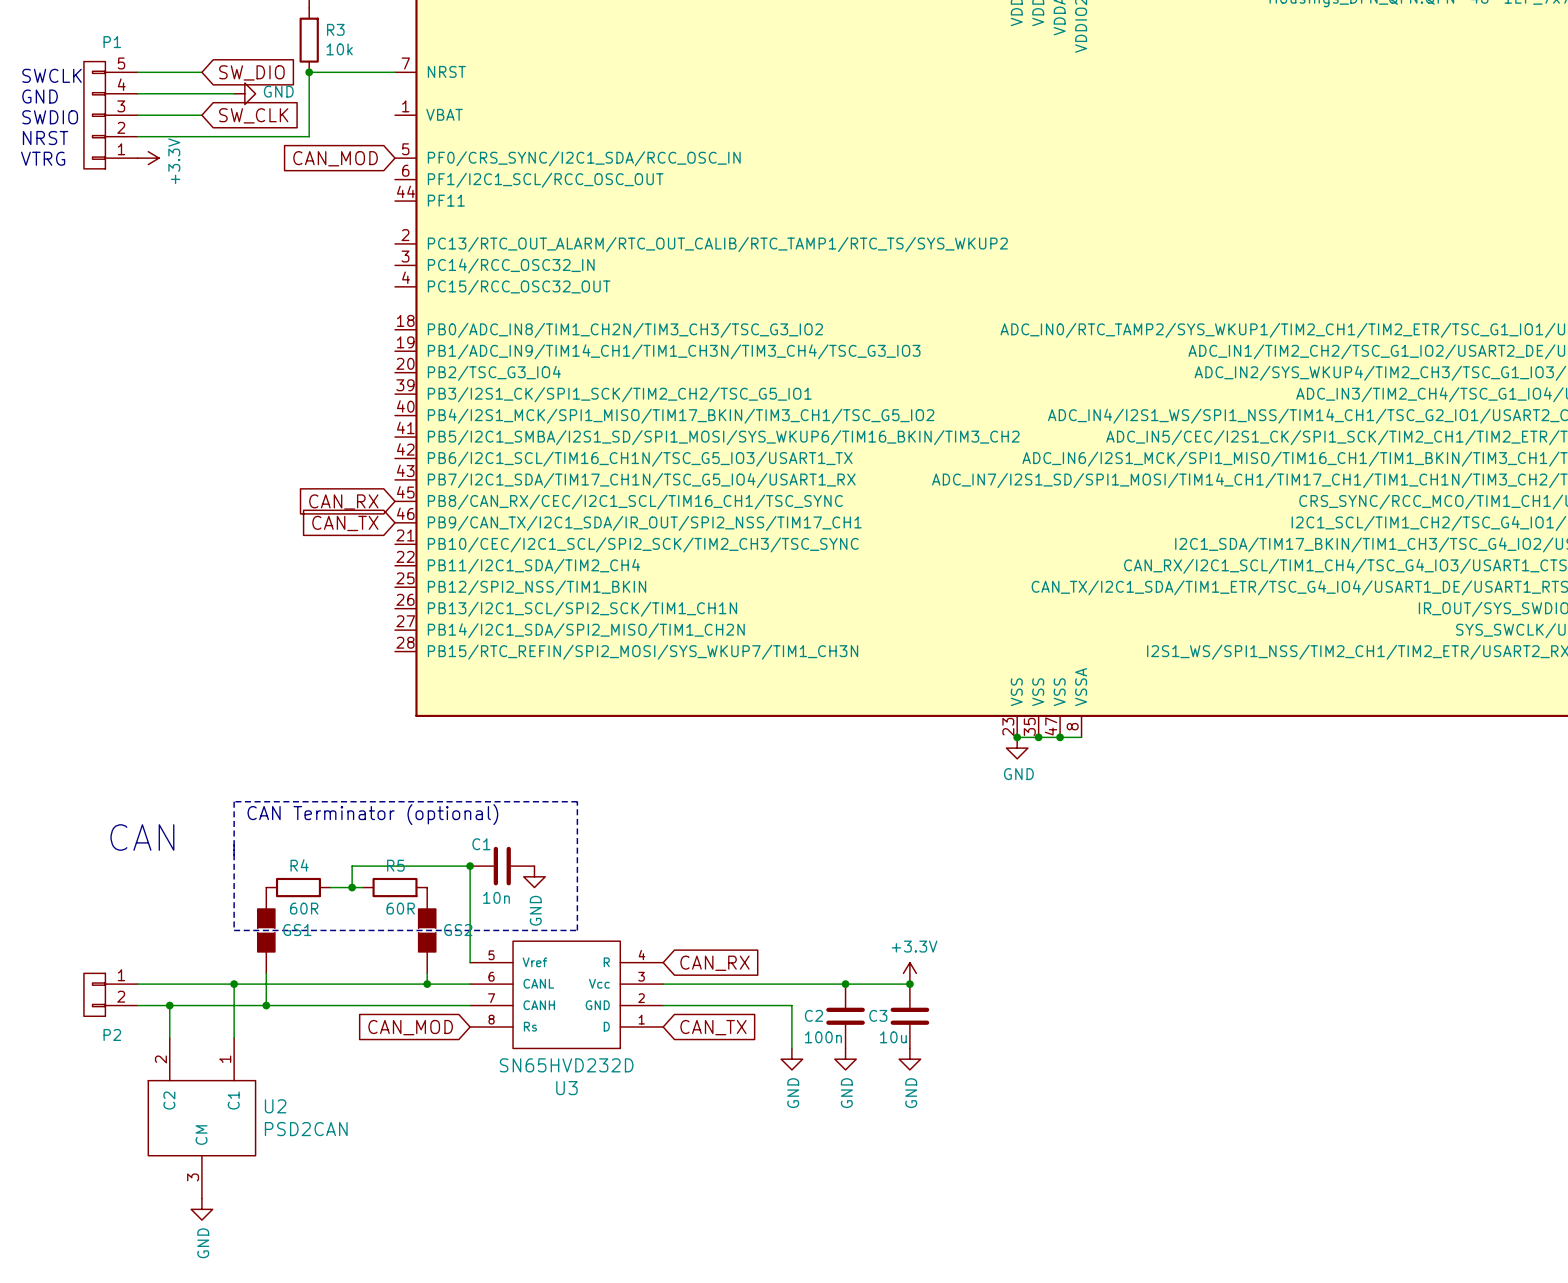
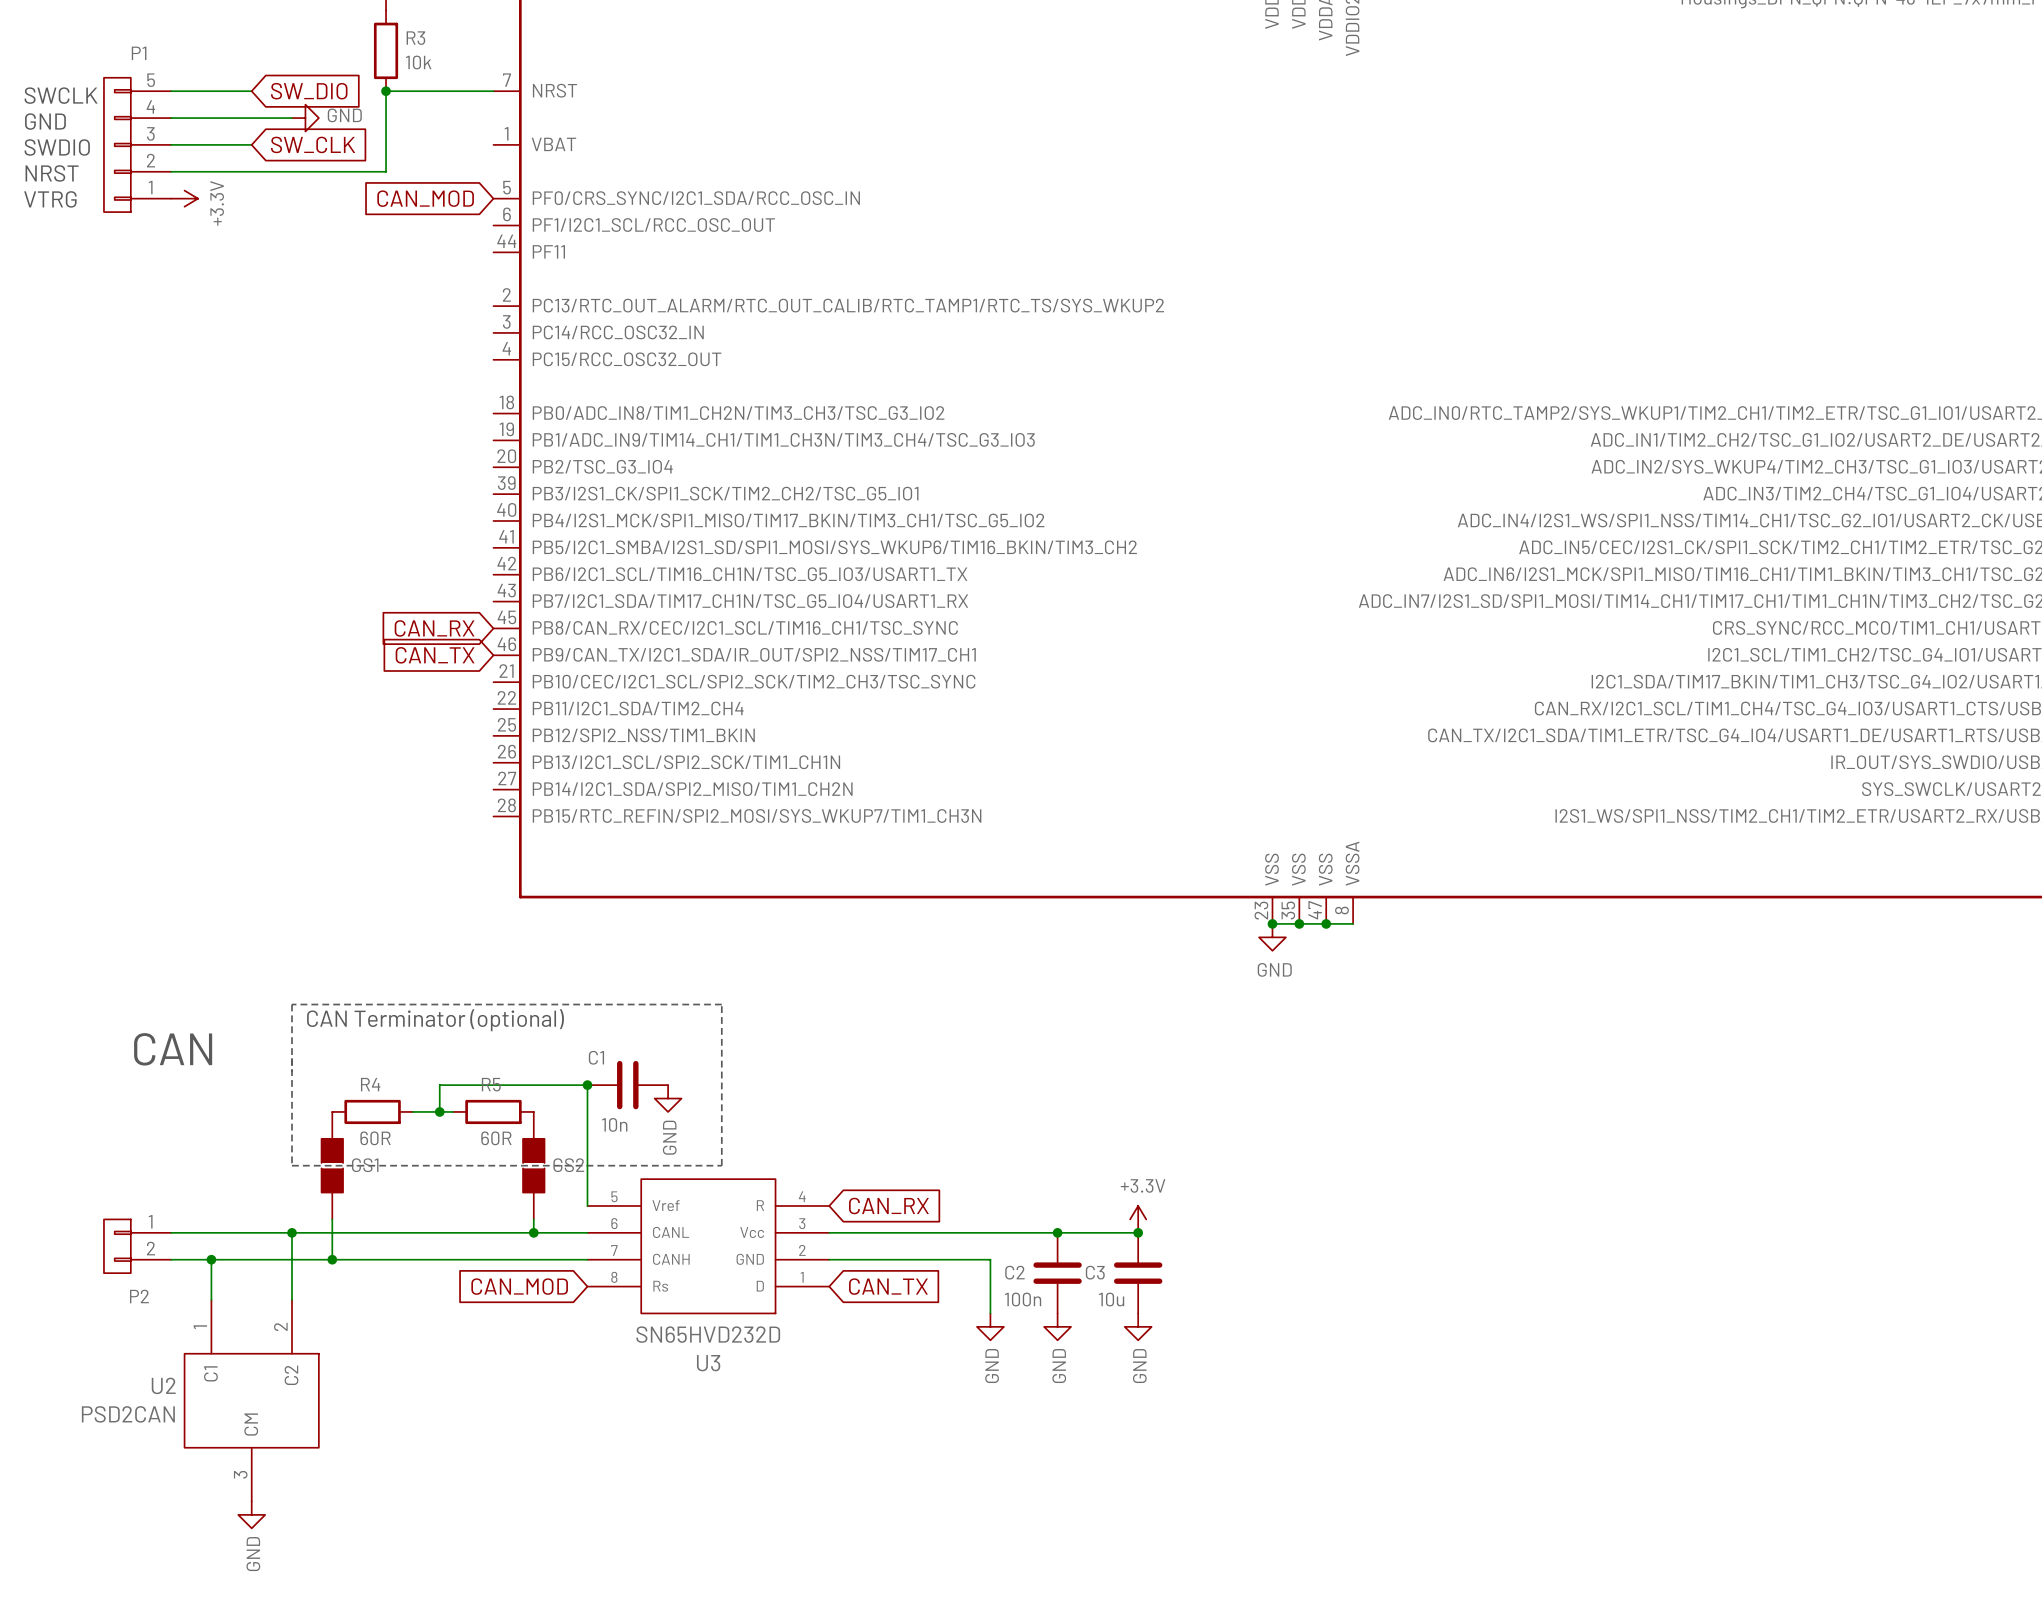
U2 flip: as is (201, 1118) -> left-right (251, 1400)

